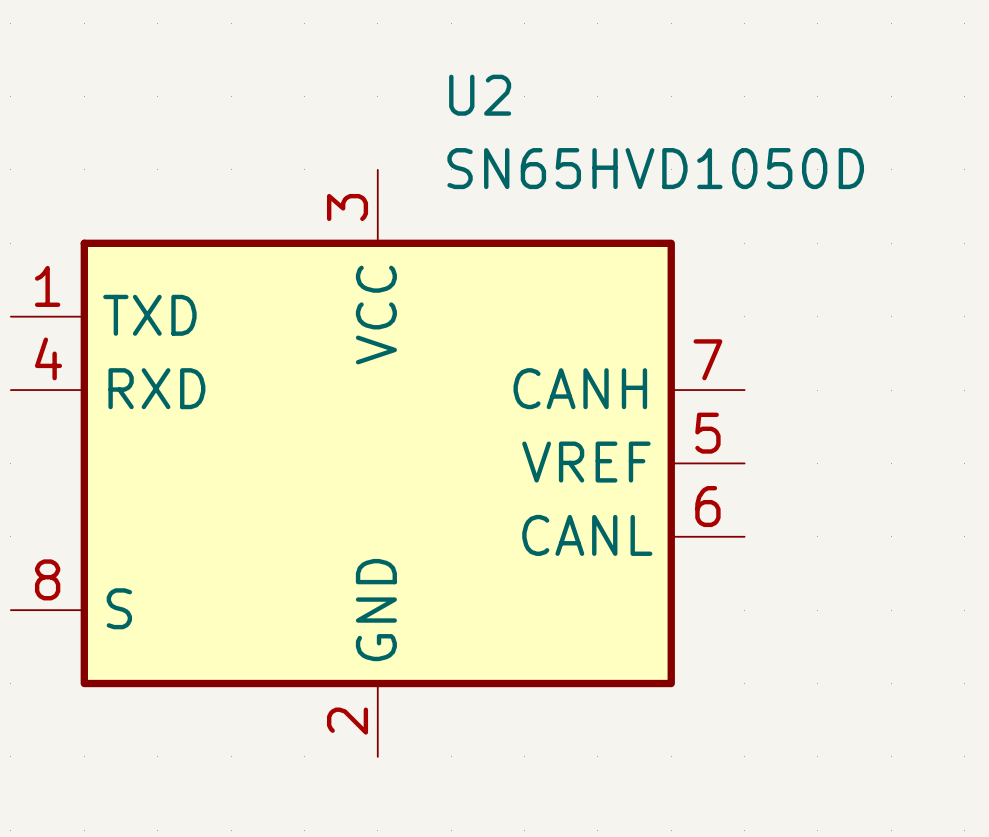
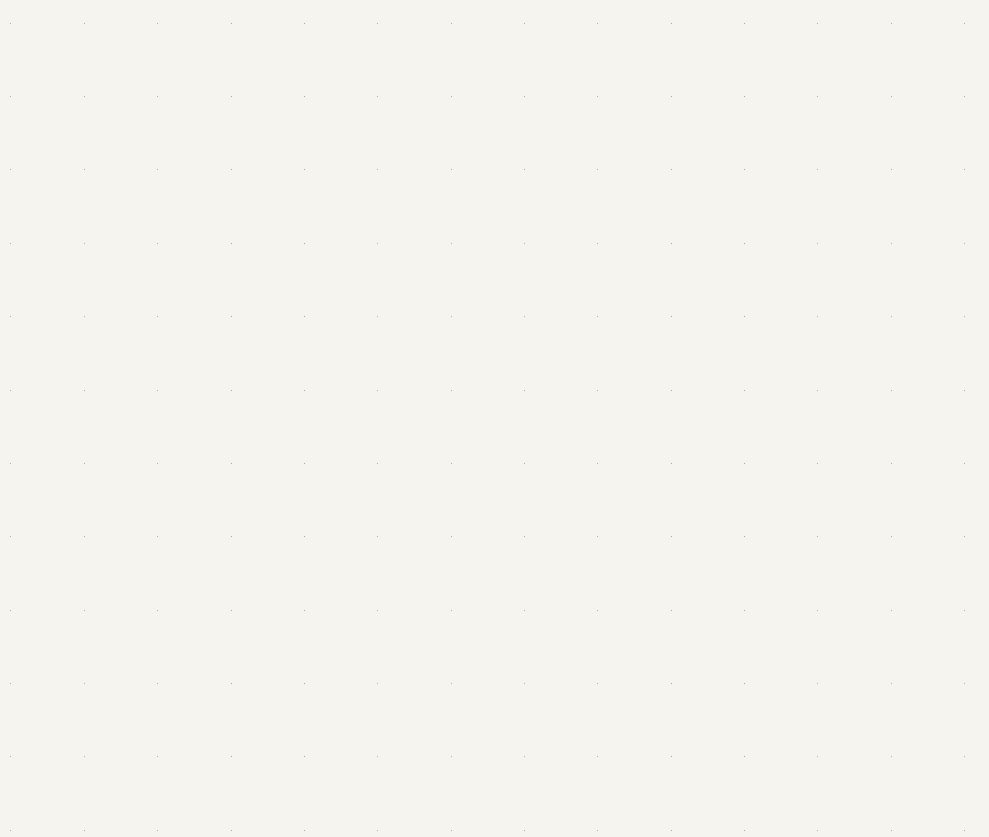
U2: SN65HVD1050D (377, 463) -> none

